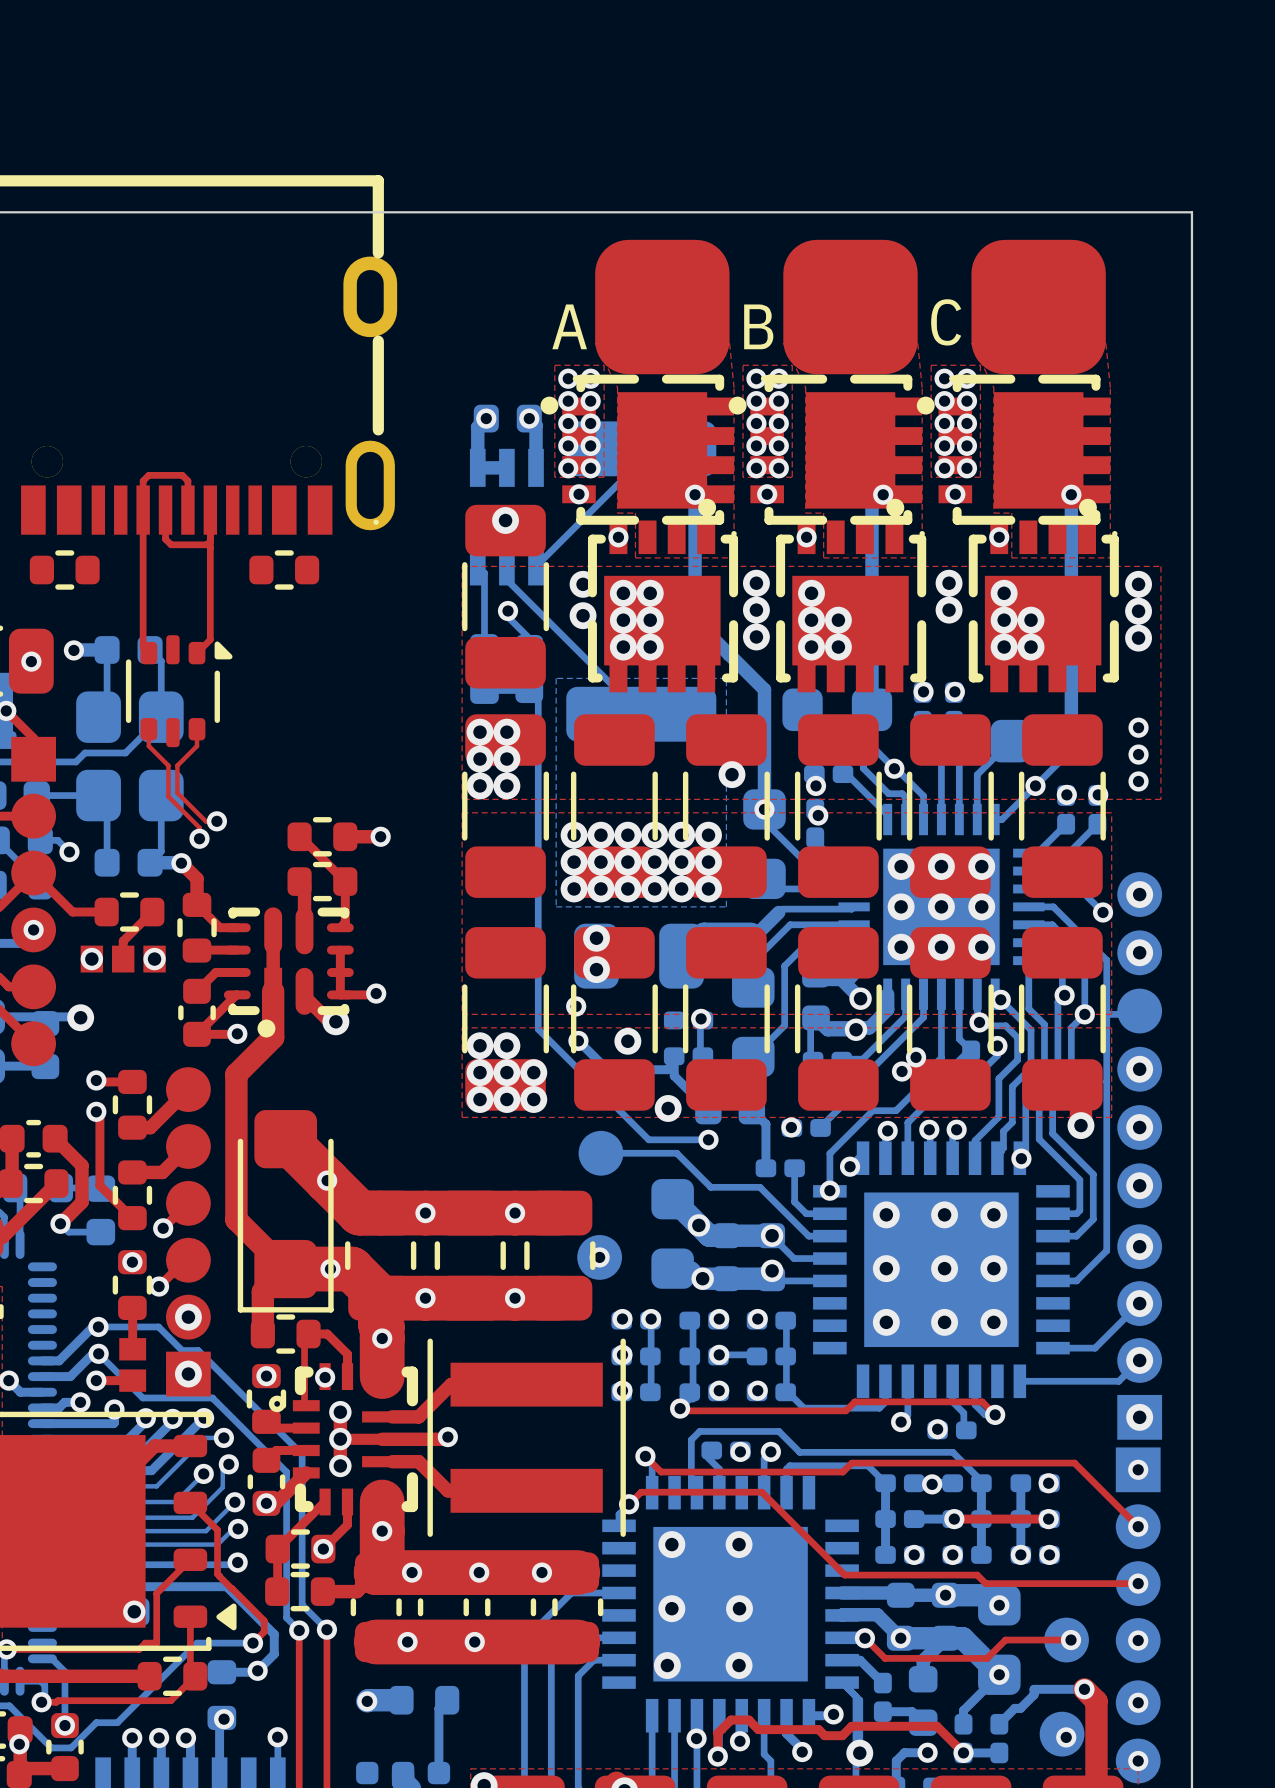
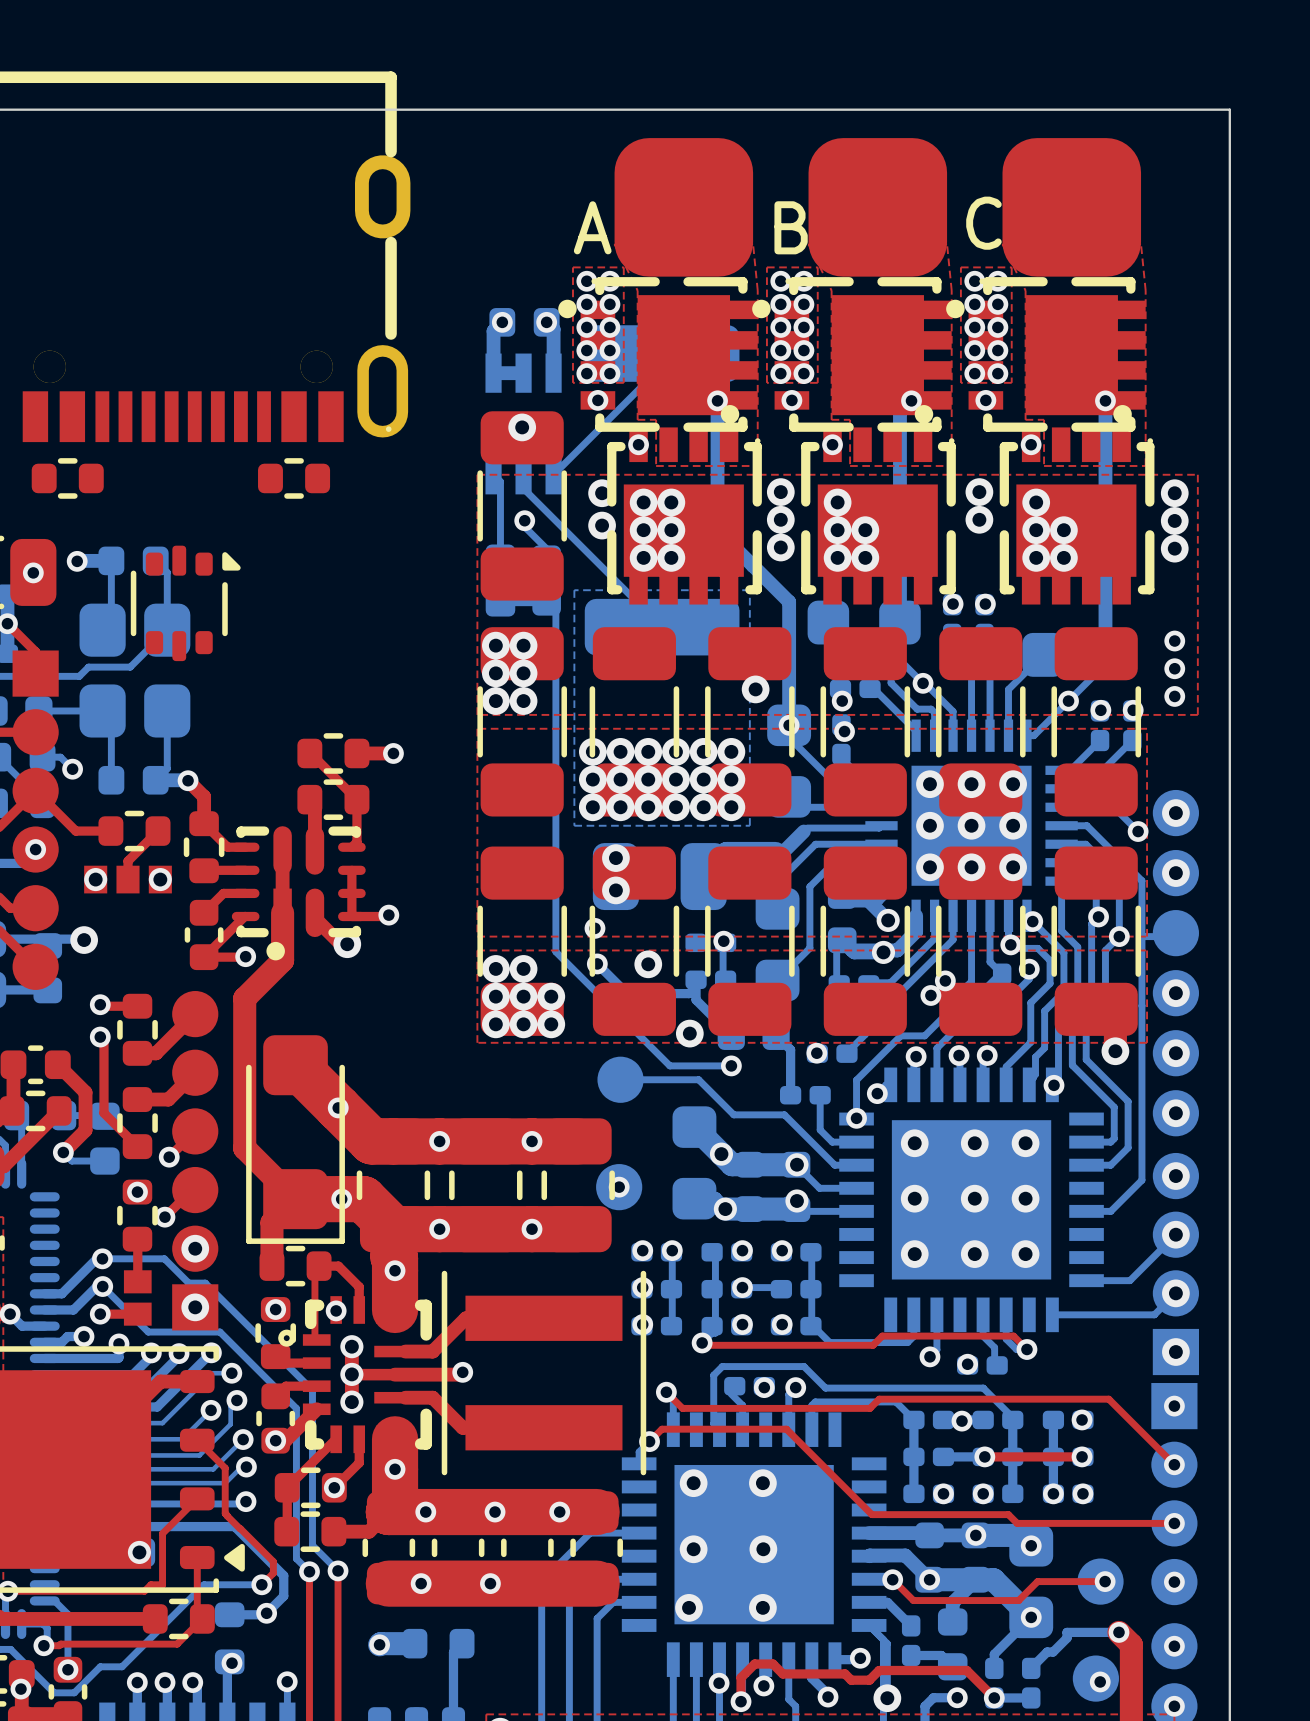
top track: (165, 510) (165, 539) (171, 544) (206, 544) (210, 541) -> none
top track: (187, 510) (187, 480) (182, 475) (148, 475) (143, 480) (143, 647) (148, 653) -> none
top track: (210, 510) (210, 639) (197, 653) -> none
top track: (148, 729) (148, 746) (168, 765) (168, 796) (199, 827) (199, 838) -> none
top track: (197, 729) (197, 746) (177, 765) (177, 792) (205, 821) (216, 821) -> none
via: (216, 821) -> none
via: (199, 838) -> none

